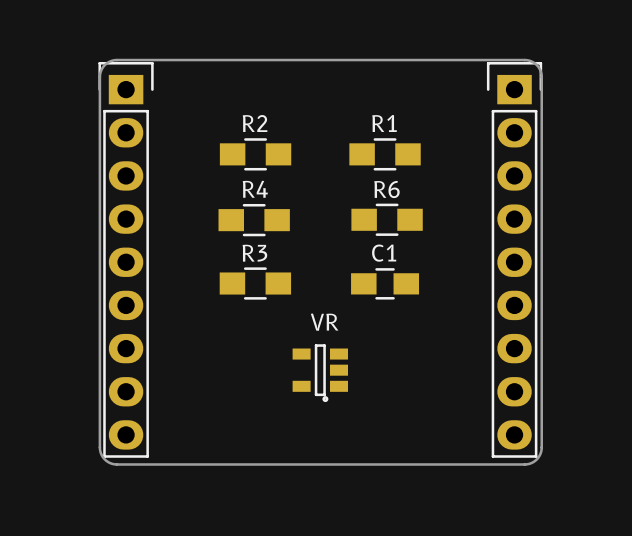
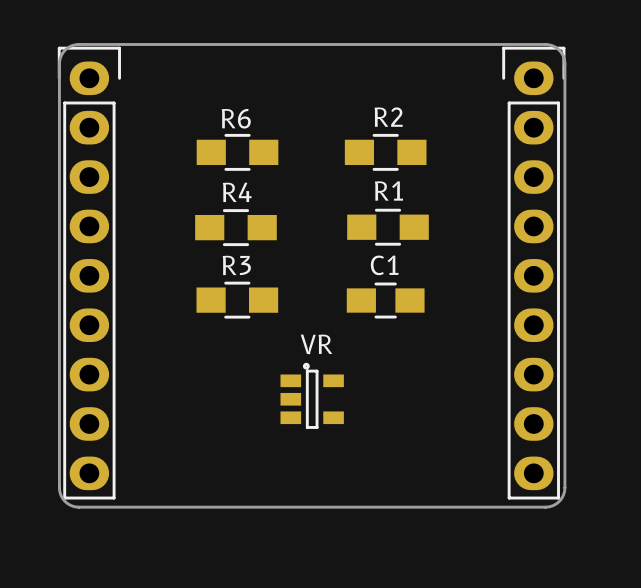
part footprint: [98, 62, 154, 458] -> [57, 46, 121, 500]
part footprint: [486, 62, 543, 458] -> [502, 46, 566, 500]
text: R2 (255, 123) -> R6 (236, 118)
text: R1 (384, 123) -> R2 (388, 117)
text: R6 (386, 189) -> R1 (388, 190)
part rotation: 0° (320, 373) -> 180° (312, 395)

